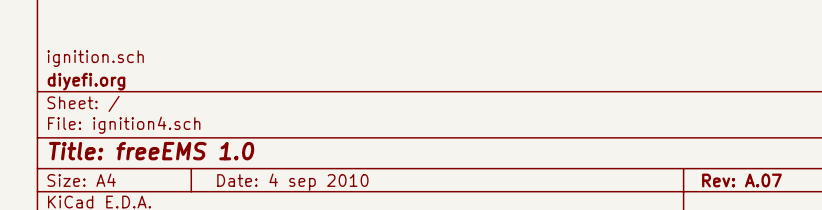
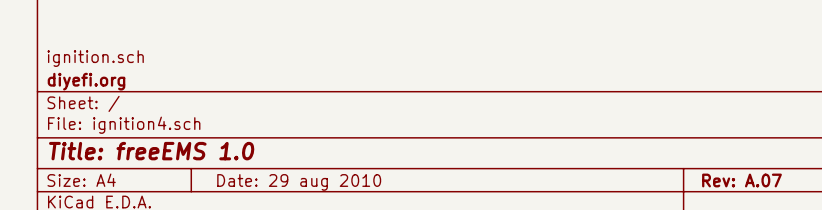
title block: Date: 4 sep 2010 (292, 182) -> Date: 29 aug 2010 (299, 182)

